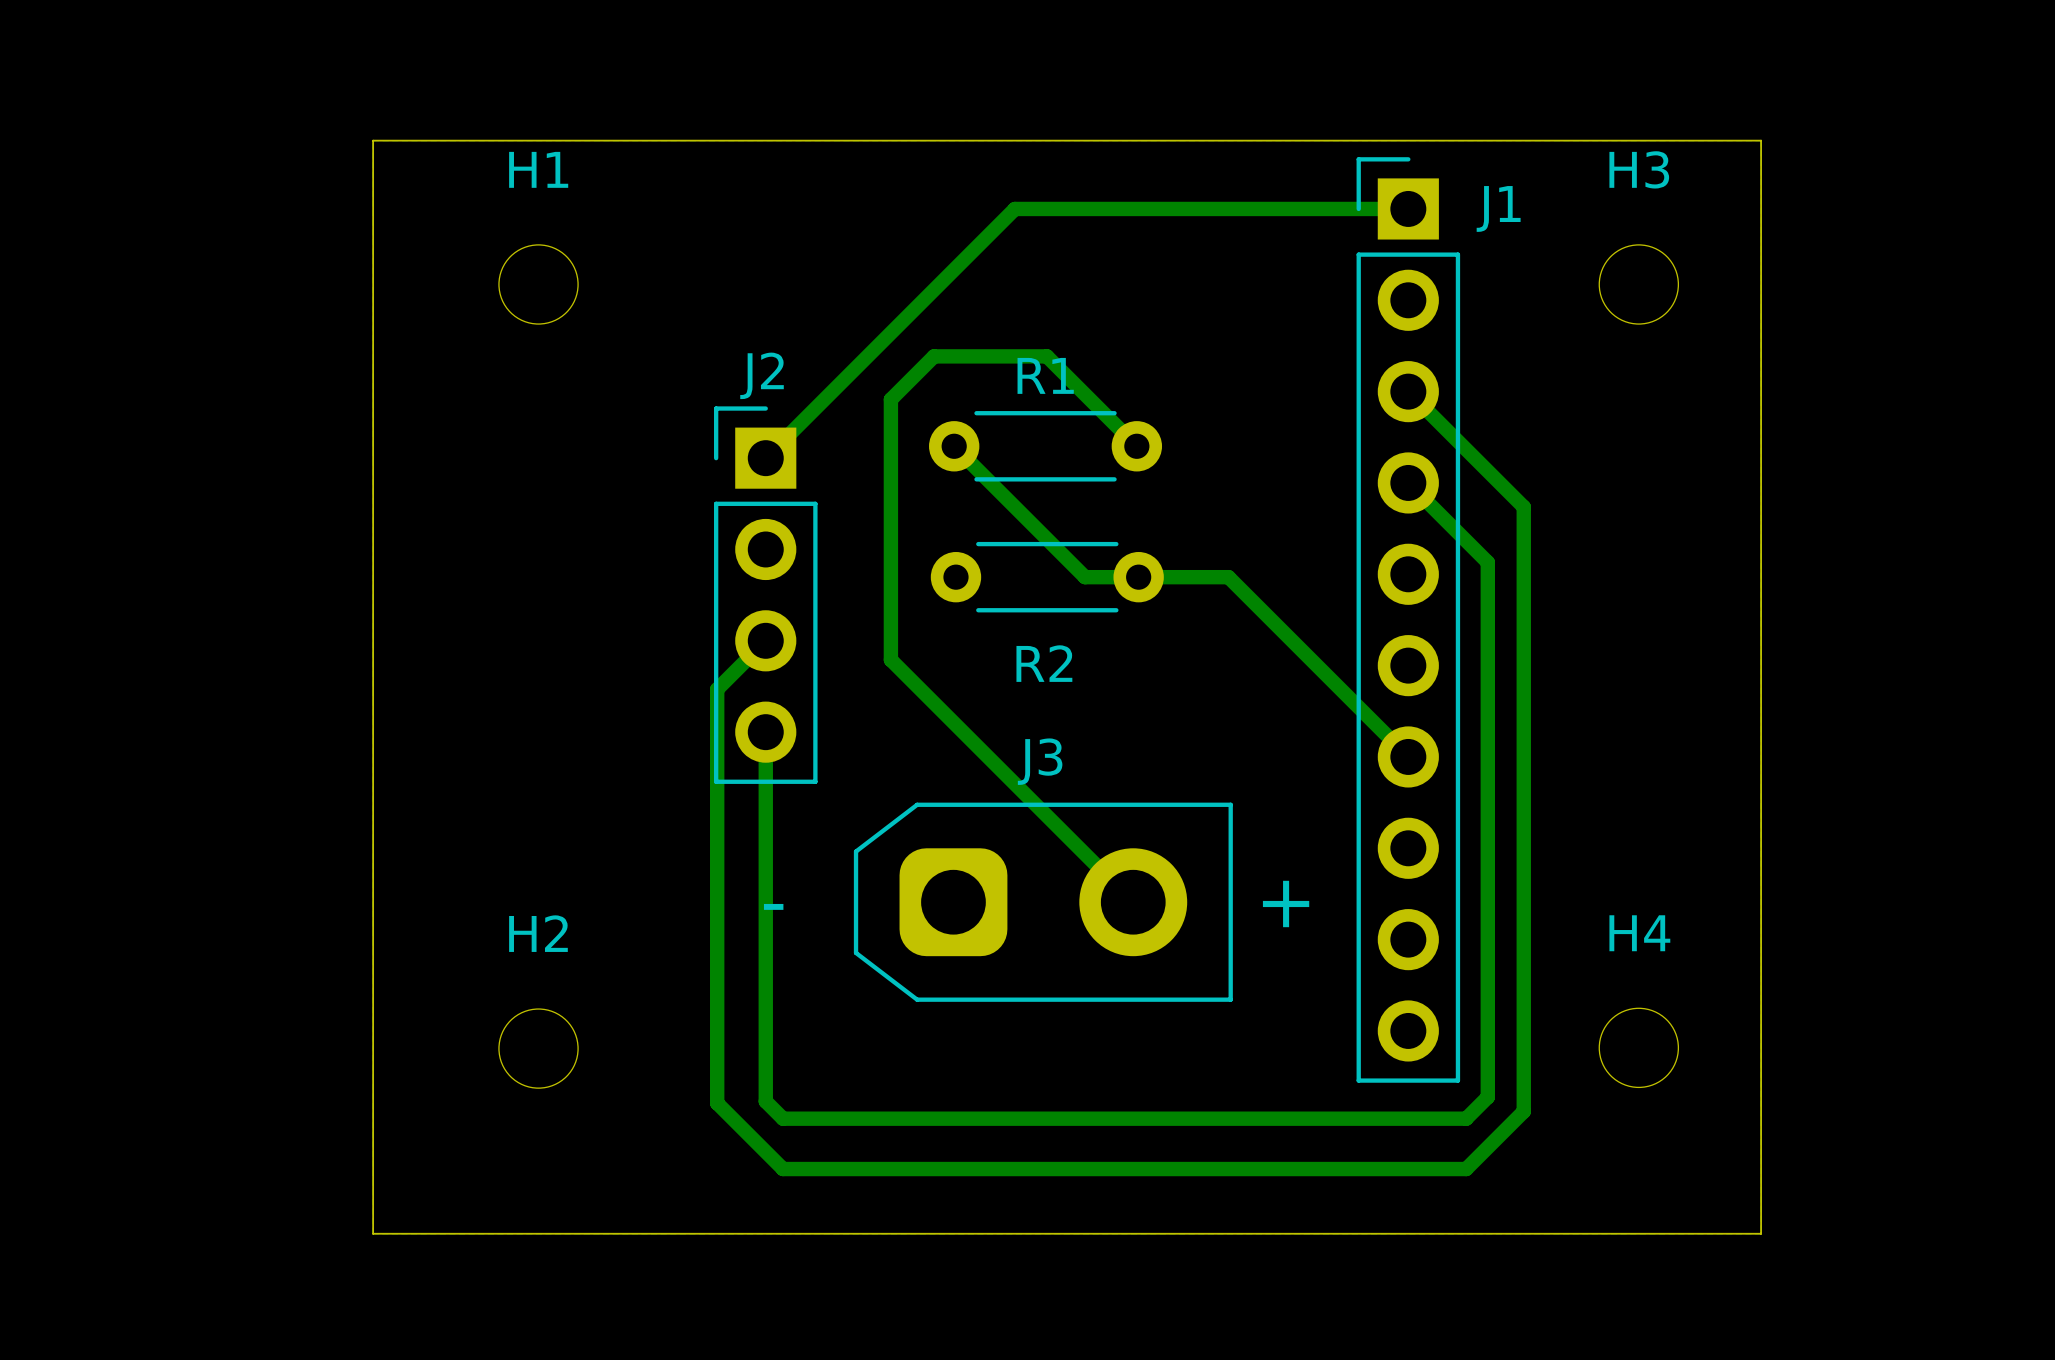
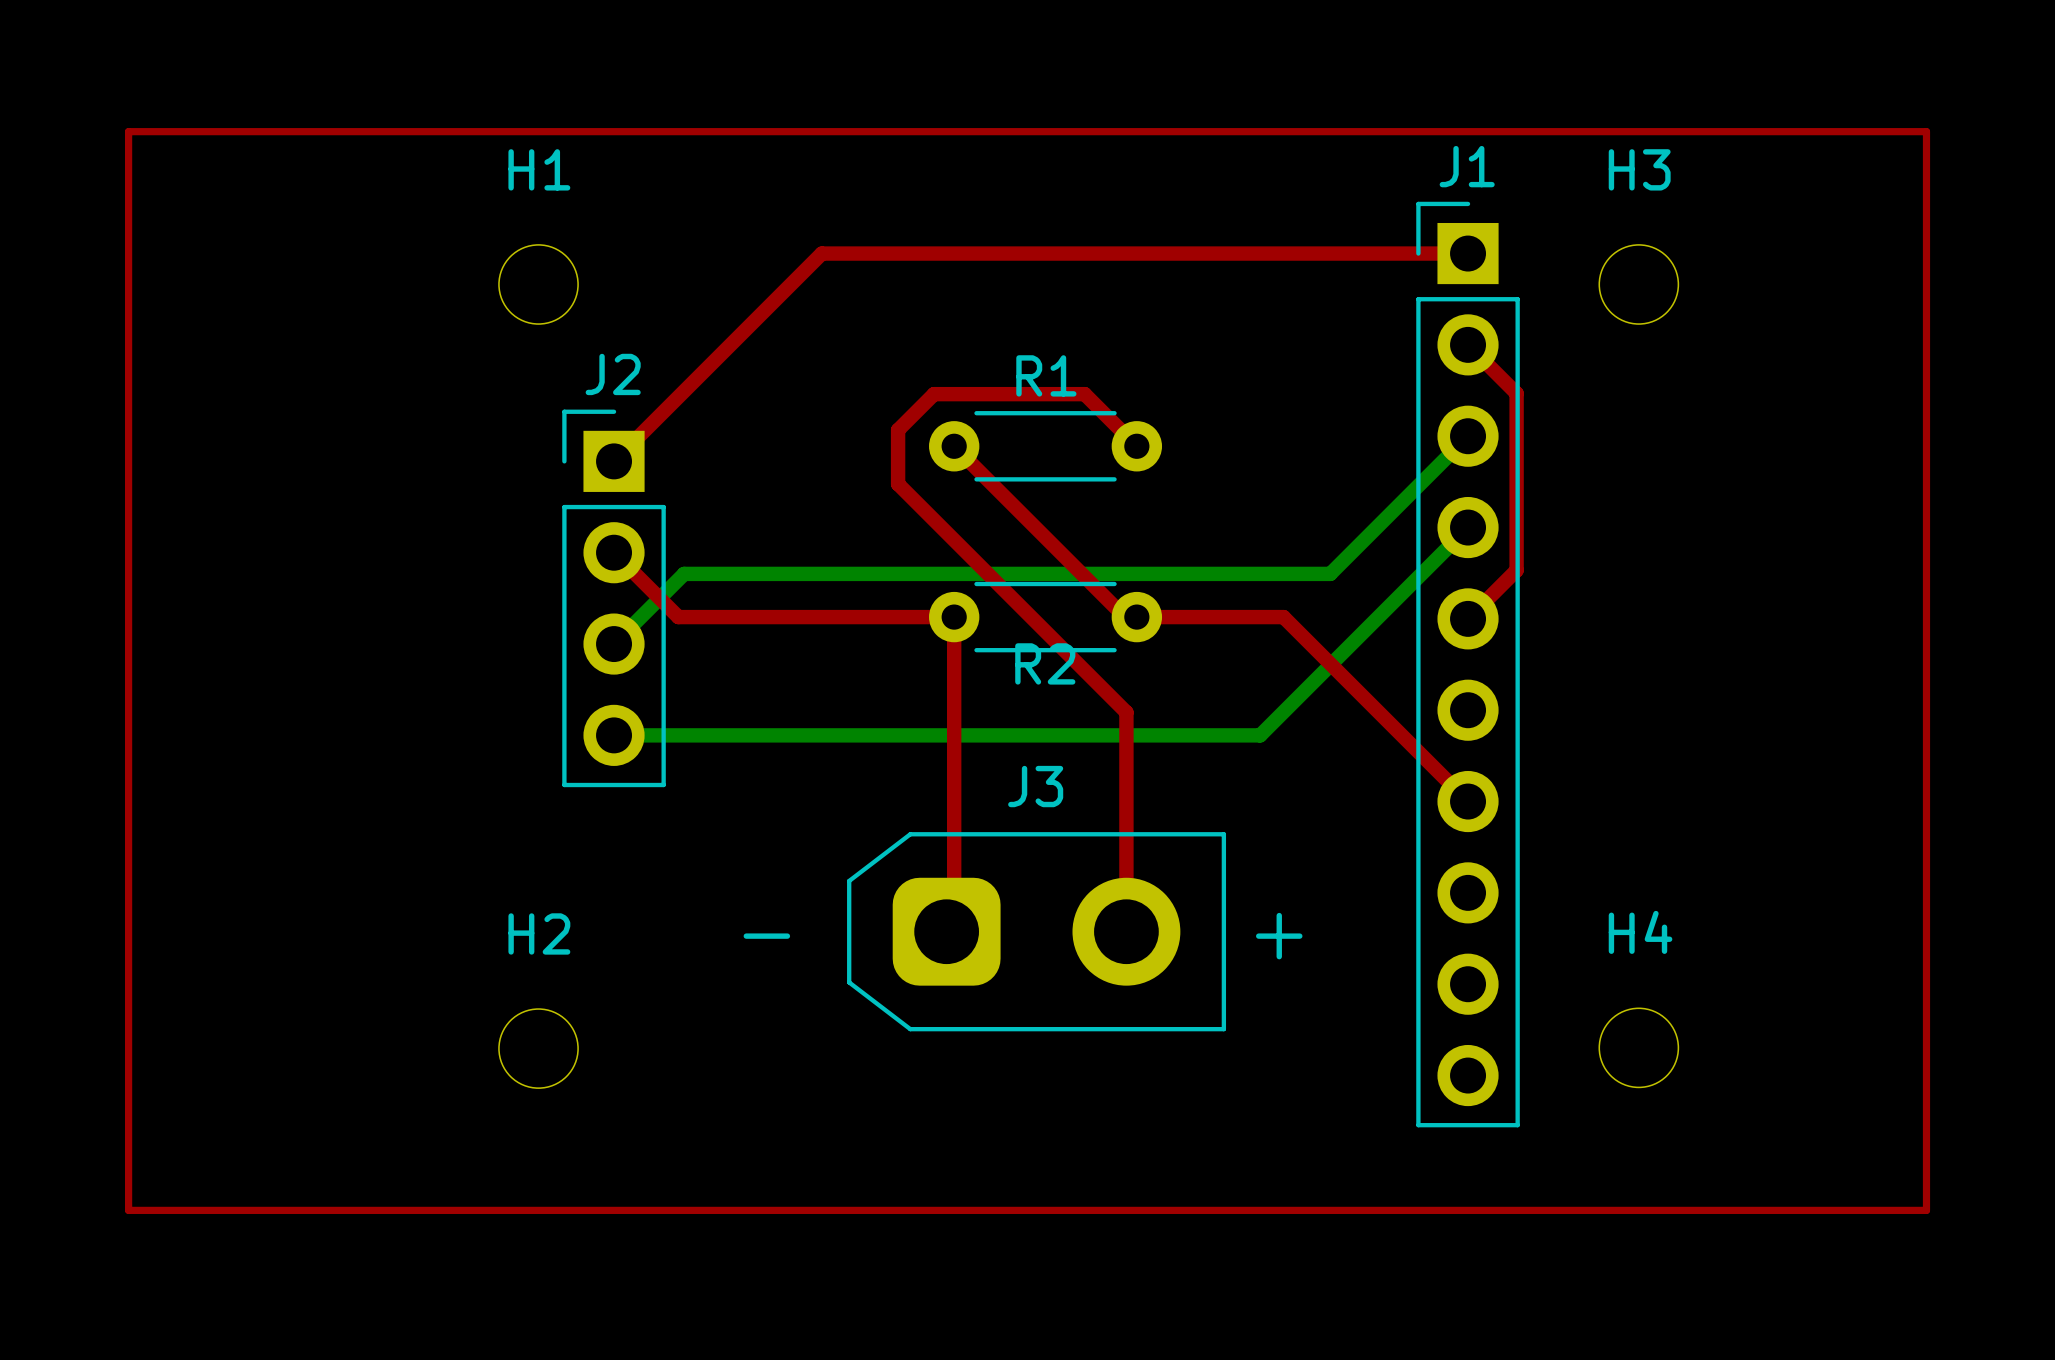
top track: none -> (128, 131) (1926, 131) (1926, 1210) (128, 1210) (128, 131)
board edge: (373, 140) (1761, 140) (1761, 1233) (373, 1233) (373, 140) -> none
bottom track: (1408, 208) (1014, 208) (765, 458) -> none
J1 name position: J1 (1498, 208) -> J1 (1467, 166)
top track: none -> (1468, 253) (821, 253) (614, 461)
top track: none -> (1468, 344) (1516, 393) (1516, 570) (1468, 618)
bottom track: (1408, 391) (1523, 507) (1523, 1111) (1466, 1169) (783, 1169) (717, 1103) (717, 689) (765, 640) -> none
bottom track: none -> (1468, 436) (1330, 573) (684, 573) (614, 644)
bottom track: (954, 446) (1085, 577) (1228, 577) (1408, 756) -> none
top track: none -> (954, 446) (1124, 617) (1283, 617) (1468, 801)
bottom track: (1136, 446) (1046, 356) (934, 356) (890, 399) (890, 659) (1133, 902) -> none
top track: none -> (1136, 446) (1084, 394) (934, 394) (898, 430) (898, 484) (1126, 712) (1126, 931)
bottom track: (1408, 482) (1487, 562) (1487, 1097) (1466, 1118) (783, 1118) (765, 1101) (765, 732) -> none
bottom track: none -> (1468, 527) (1260, 735) (614, 735)
top track: none -> (614, 552) (678, 617) (954, 617) (954, 924)
R2 position: (1047, 577) -> (1045, 617)
J2 position: (765, 595) -> (614, 598)
J1 position: (1408, 619) -> (1468, 664)
J3 position: (1043, 902) -> (1036, 931)

